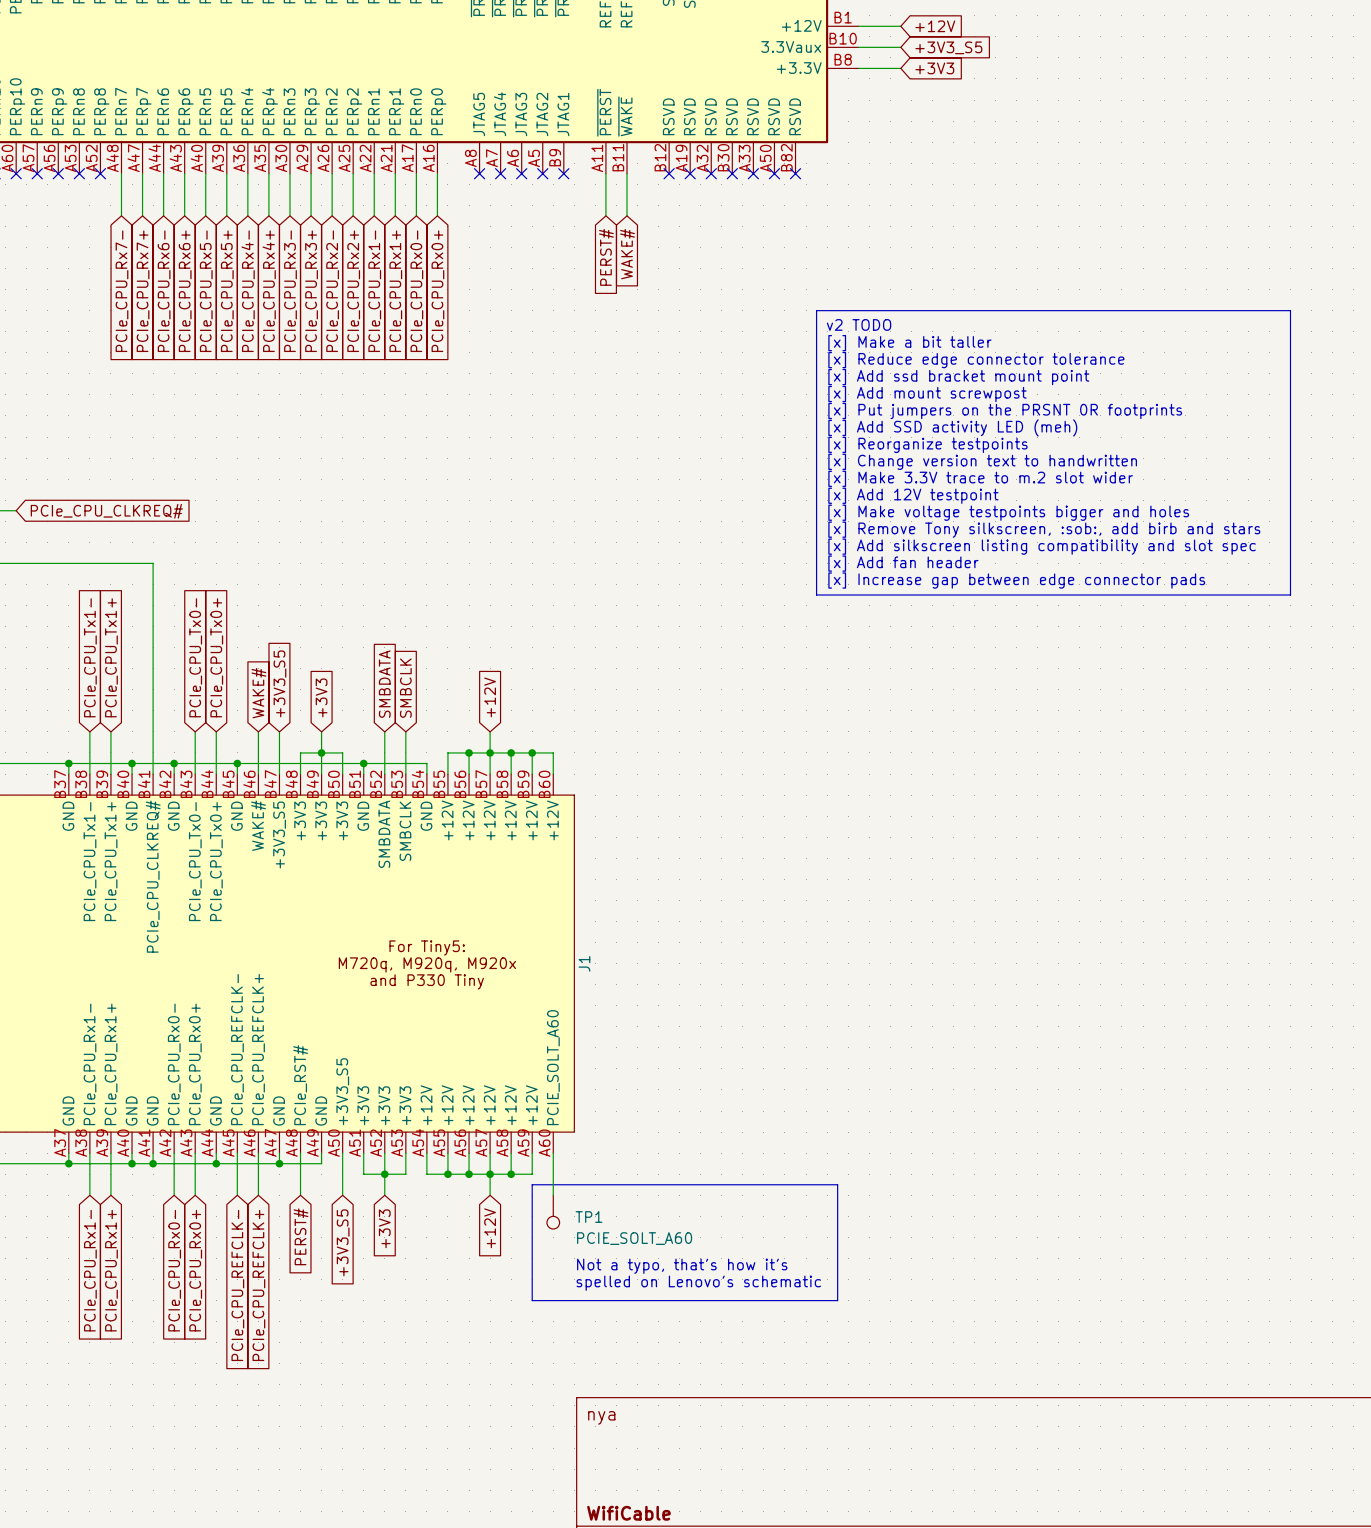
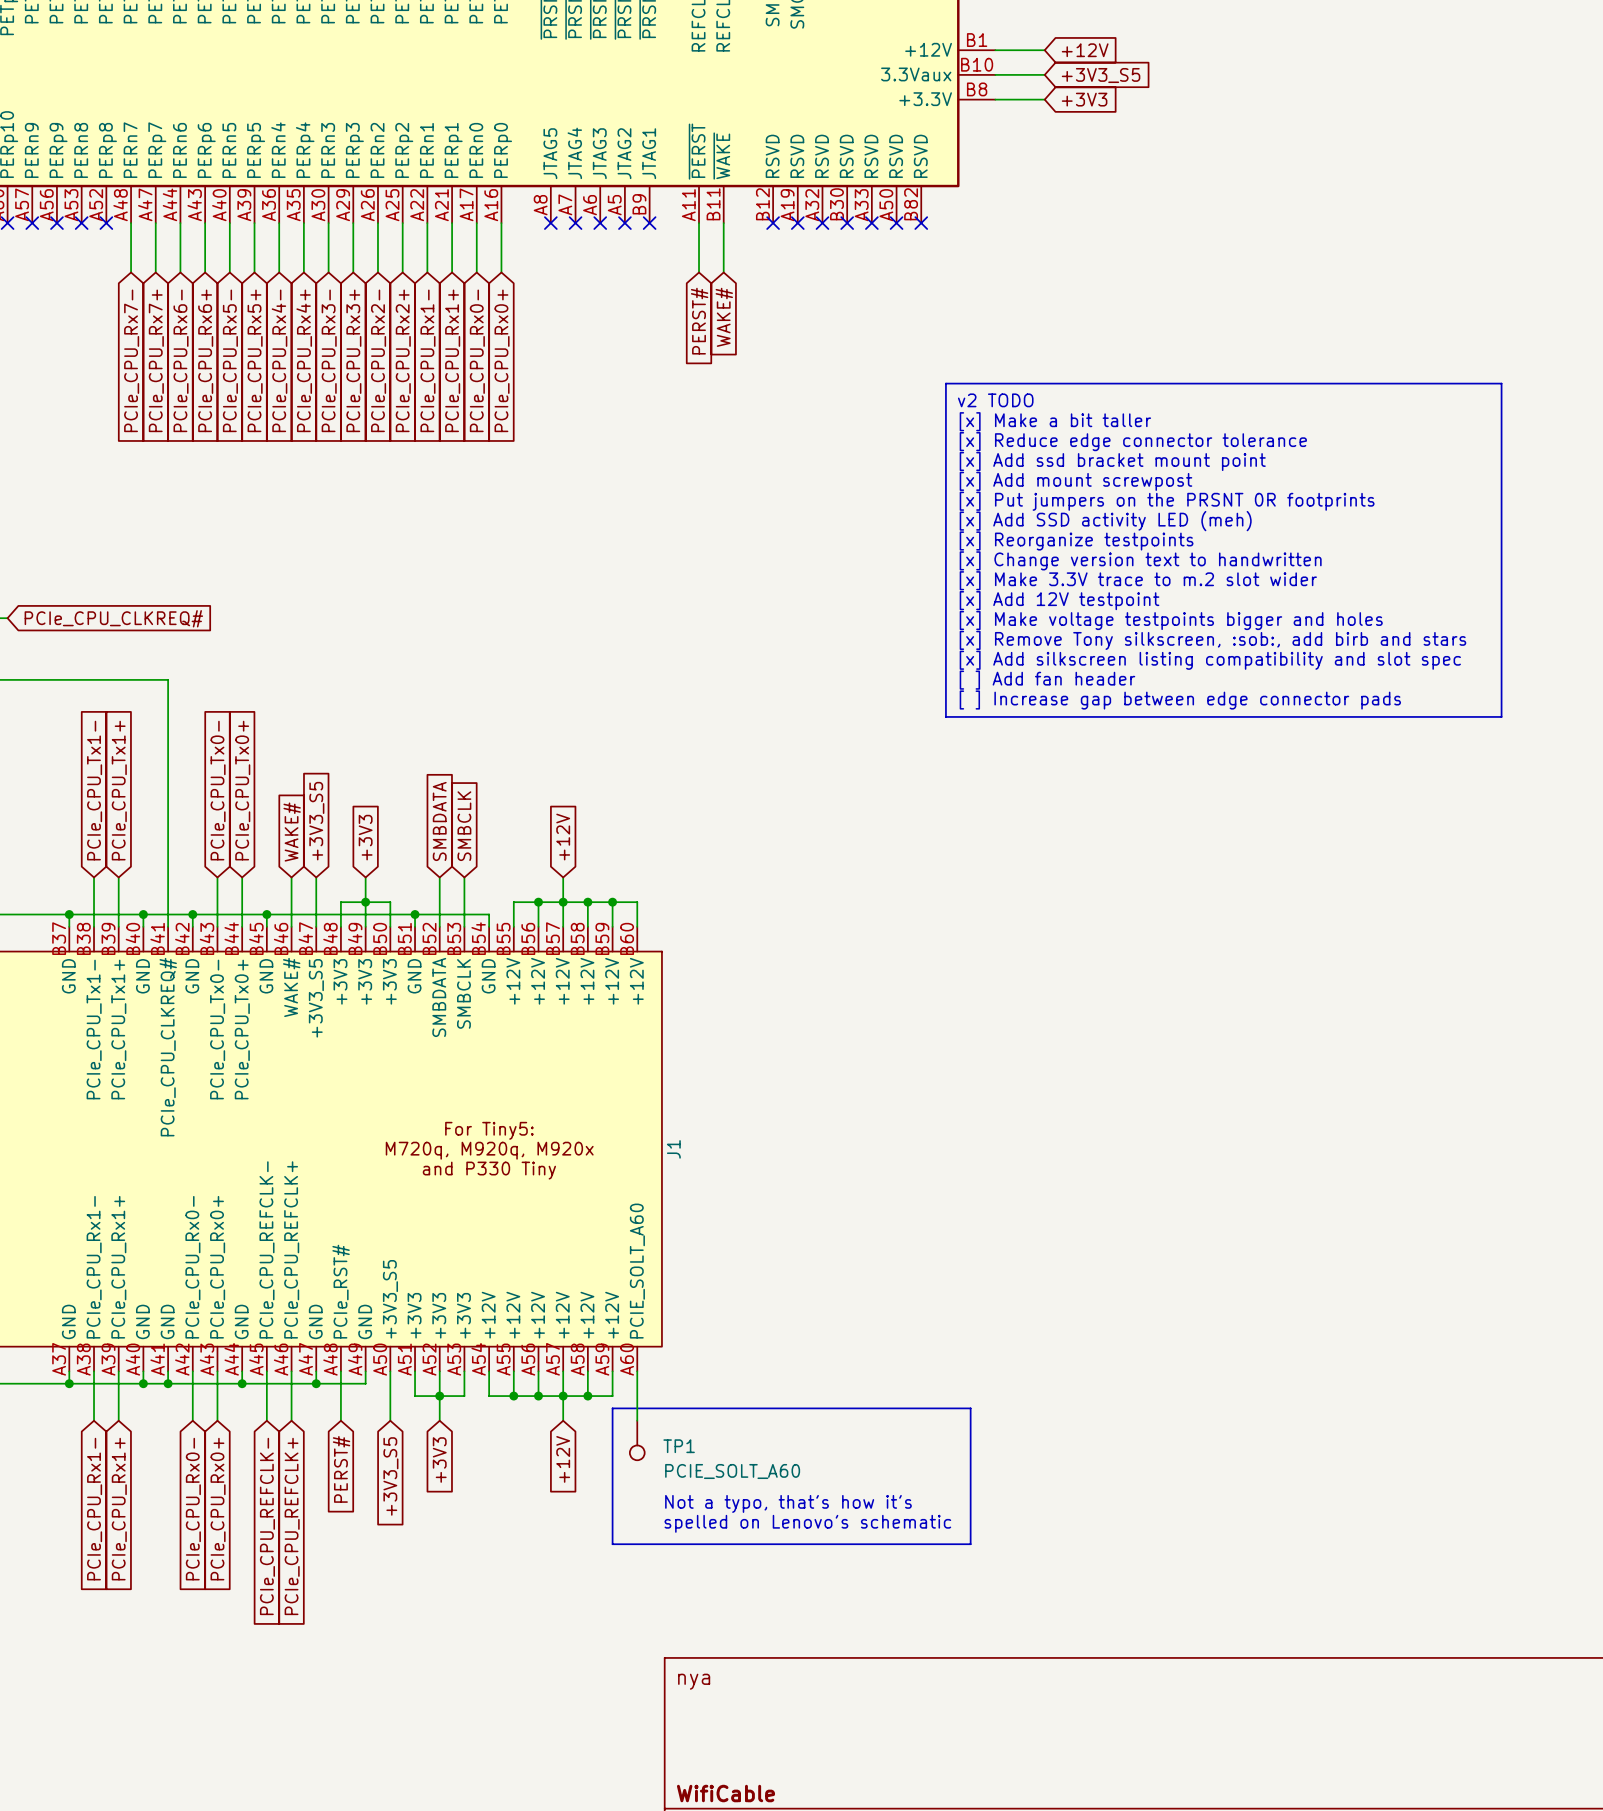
text: [x] Add fan header (903, 563) -> [ ] Add fan header (1047, 680)
text: [x] Increase gap between edge connector pads (1016, 580) -> [ ] Increase gap between edge connector pads (1180, 700)

